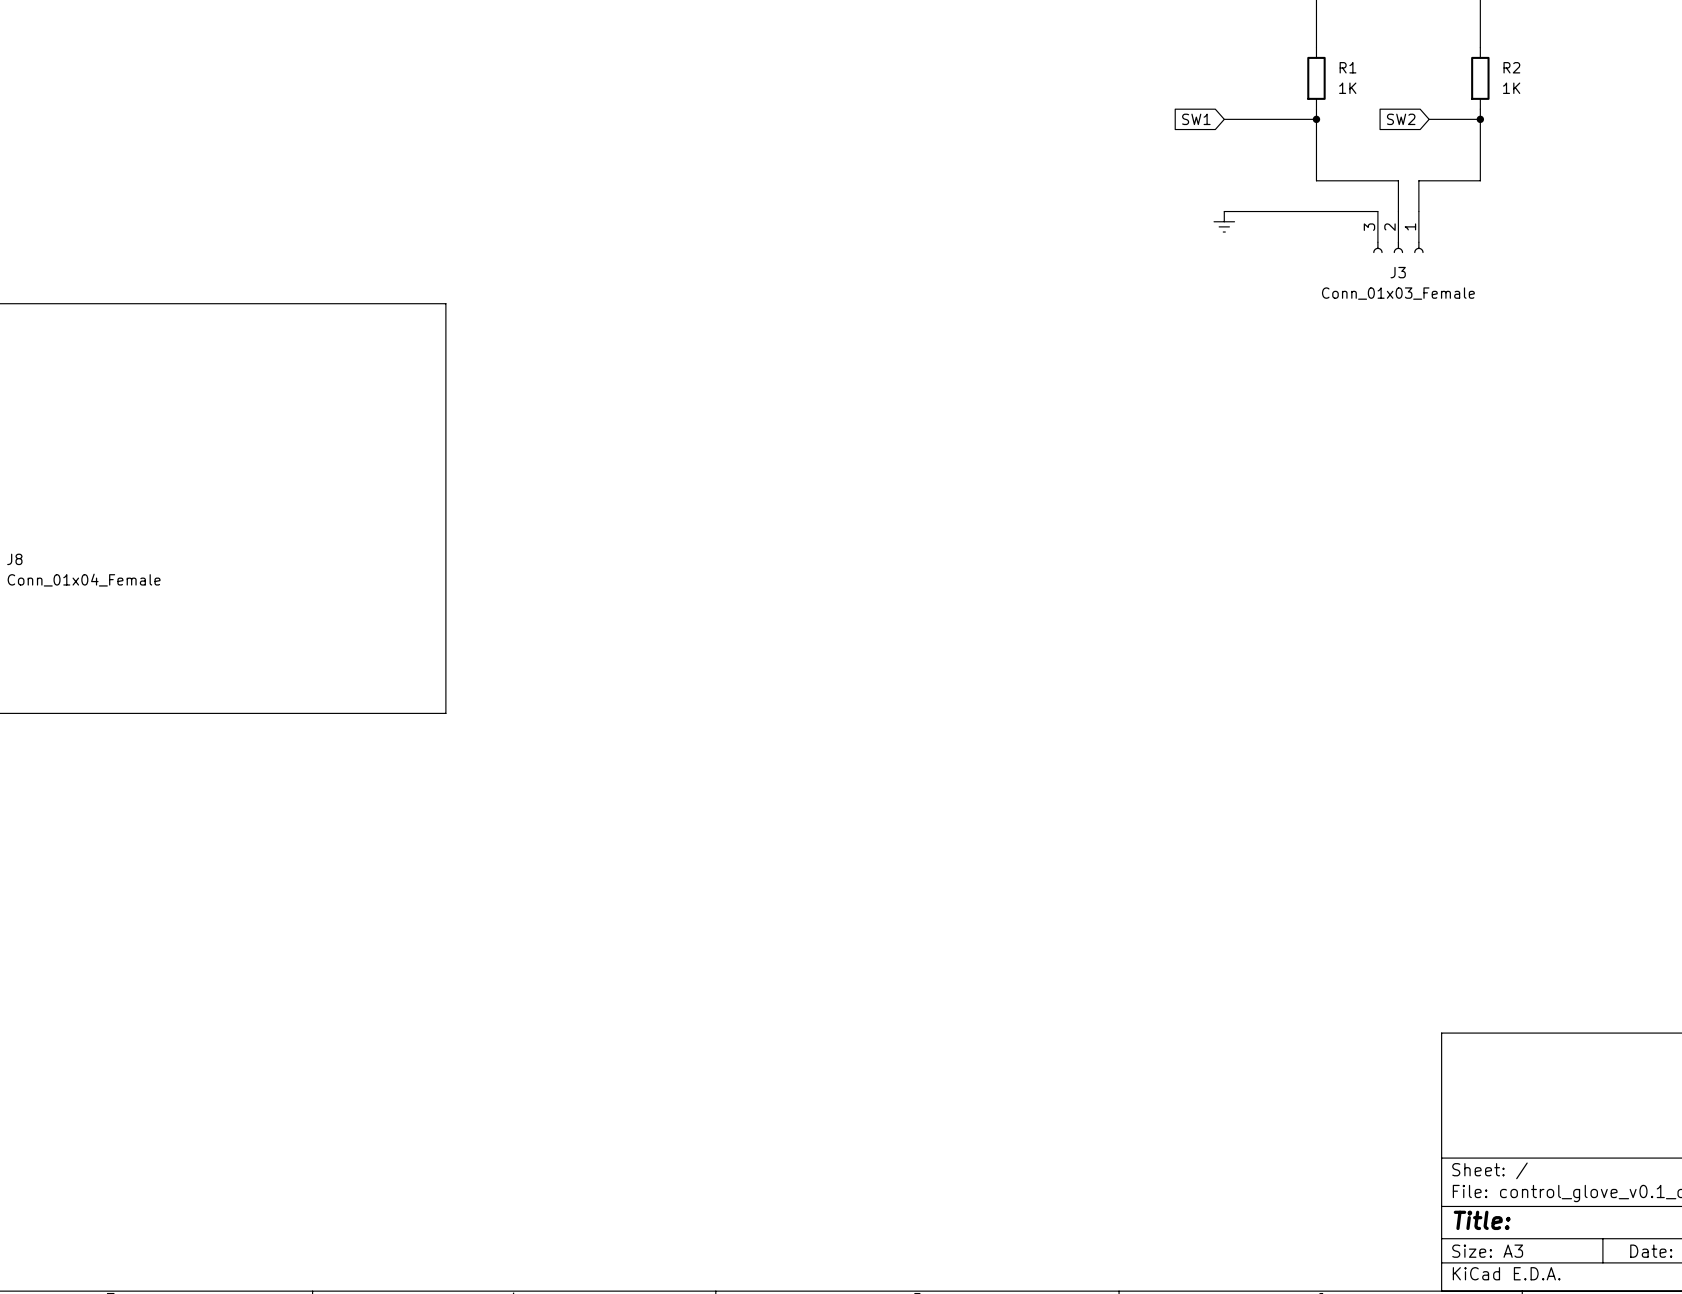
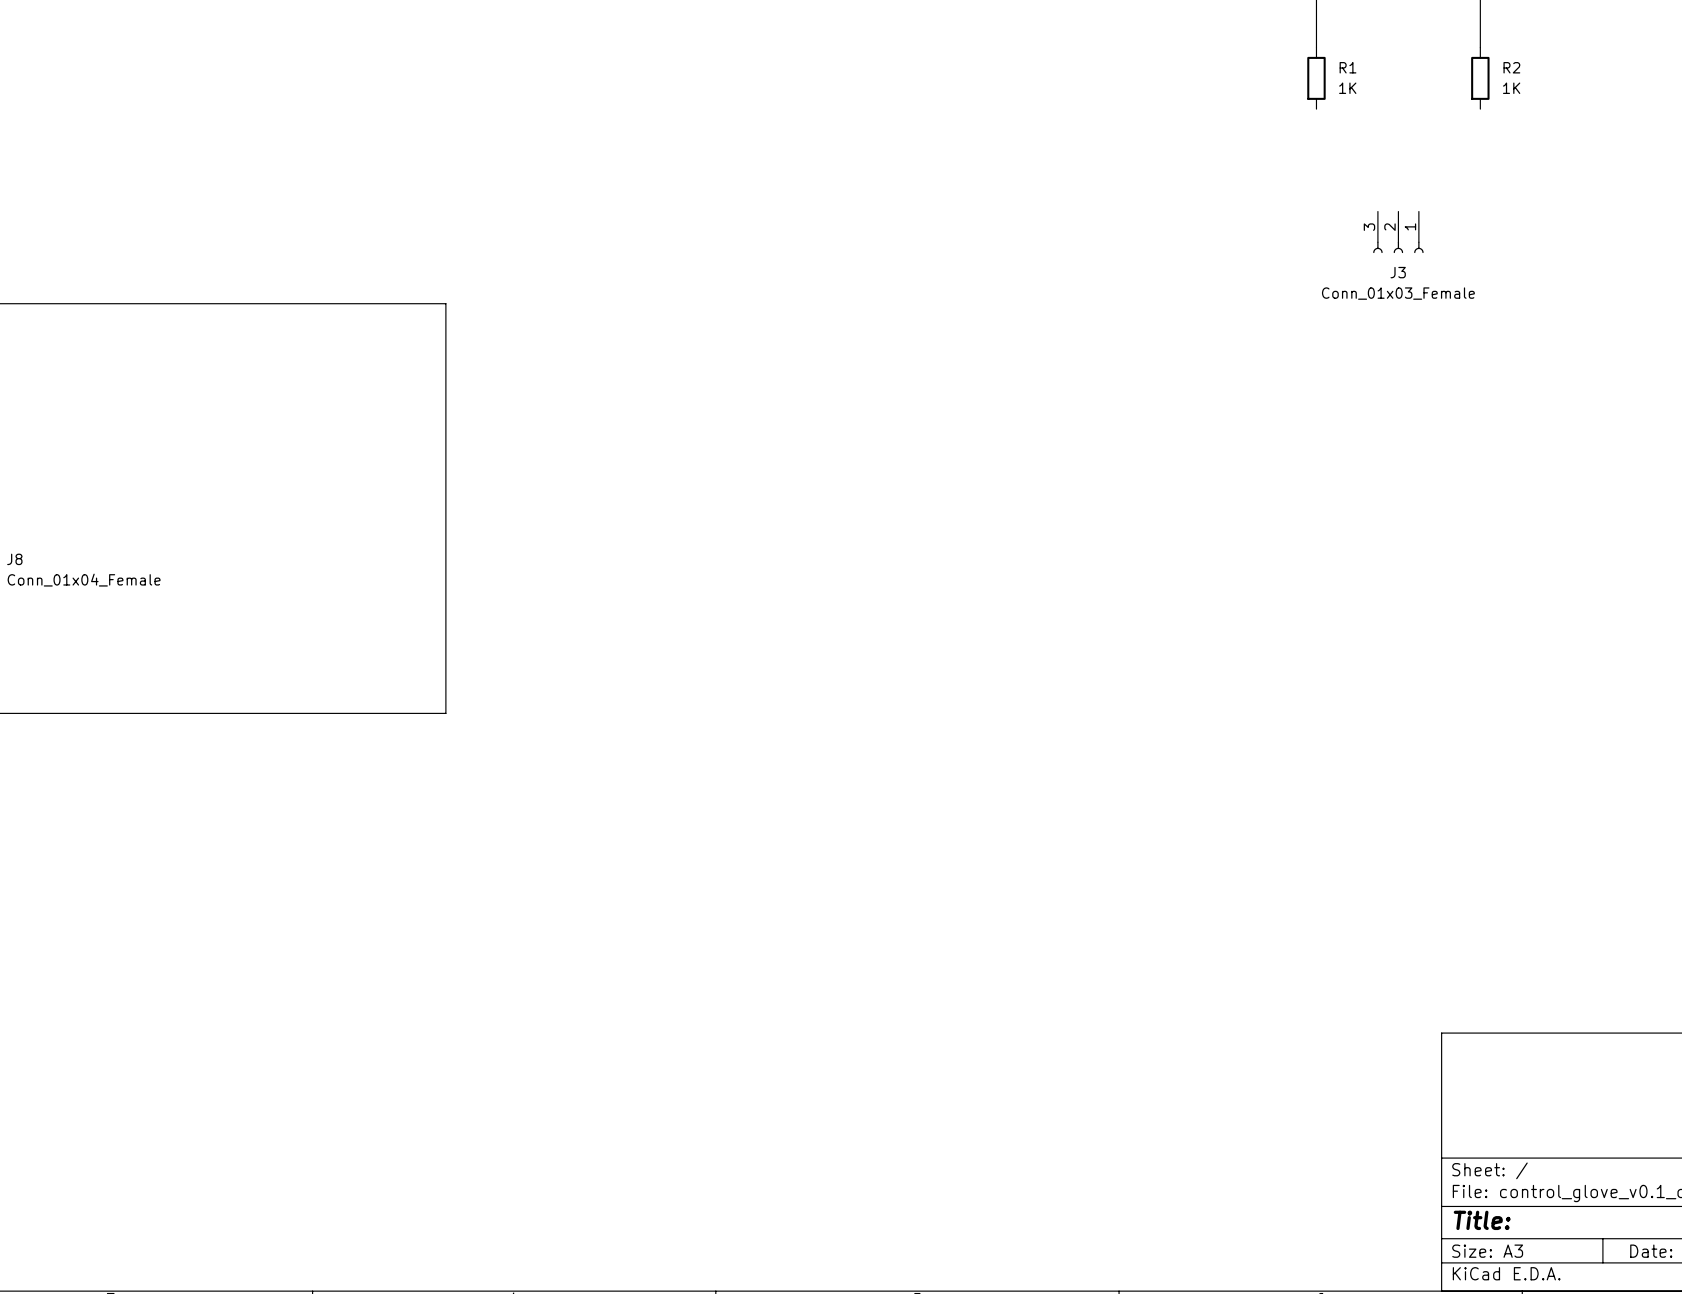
wire: (1316, 109) (1316, 180) (1398, 180) (1398, 211) -> none
wire: (1480, 109) (1480, 180) (1418, 180) (1418, 211) -> none
global label: SW1 (1196, 119) -> none
wire: (1224, 119) (1316, 119) -> none
junction: (1316, 119) -> none
global label: SW2 (1401, 119) -> none
wire: (1429, 119) (1480, 119) -> none
junction: (1480, 119) -> none
wire: (1224, 211) (1377, 211) -> none
power symbol: (1224, 221) -> none

